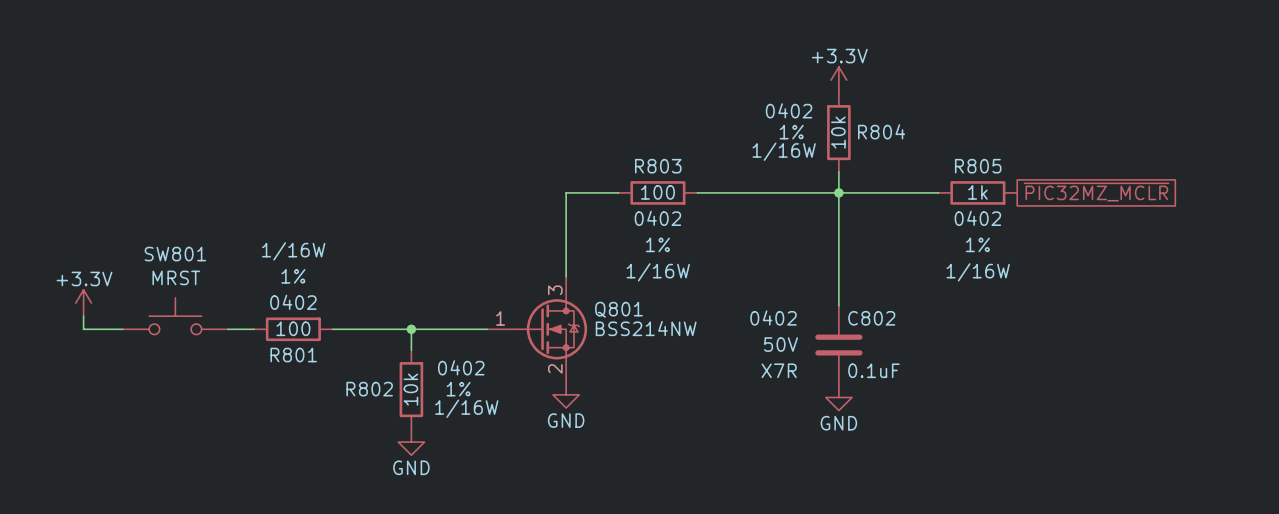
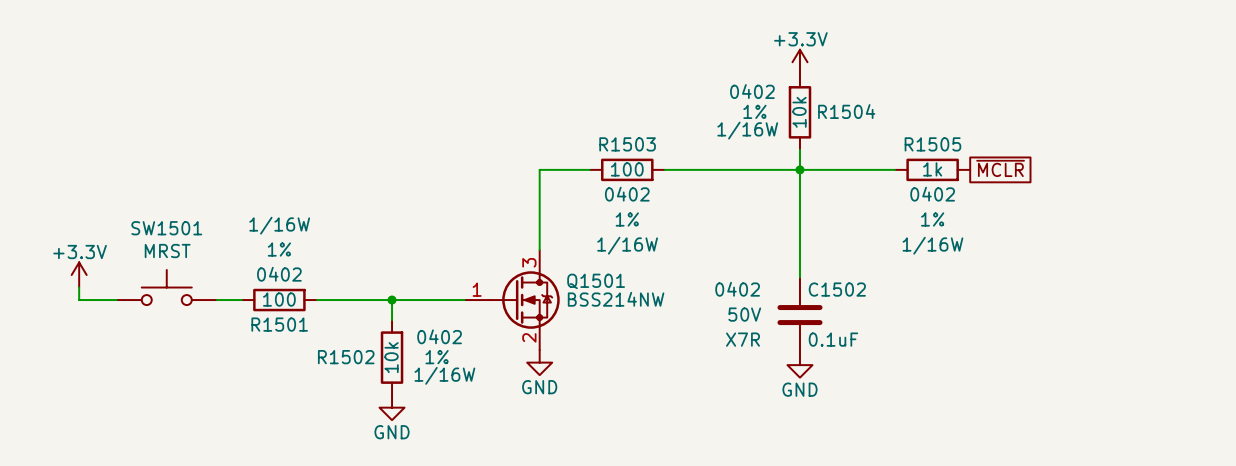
R804 name: R804 (881, 131) -> R1504 (846, 111)
R803 name: R803 (658, 166) -> R1503 (627, 144)
R805 name: R805 (978, 166) -> R1505 (932, 144)
global label: ~{PIC32MZ_MCLR} (1096, 192) -> ~{MCLR} (1000, 168)
SW801 name: SW801 (175, 254) -> SW1501 (166, 228)
Q801 name: Q801 (619, 309) -> Q1501 (596, 281)
C802 name: C802 (871, 318) -> C1502 (837, 289)
R801 name: R801 (293, 355) -> R1501 (279, 324)
R802 name: R802 (369, 389) -> R1502 (346, 357)

